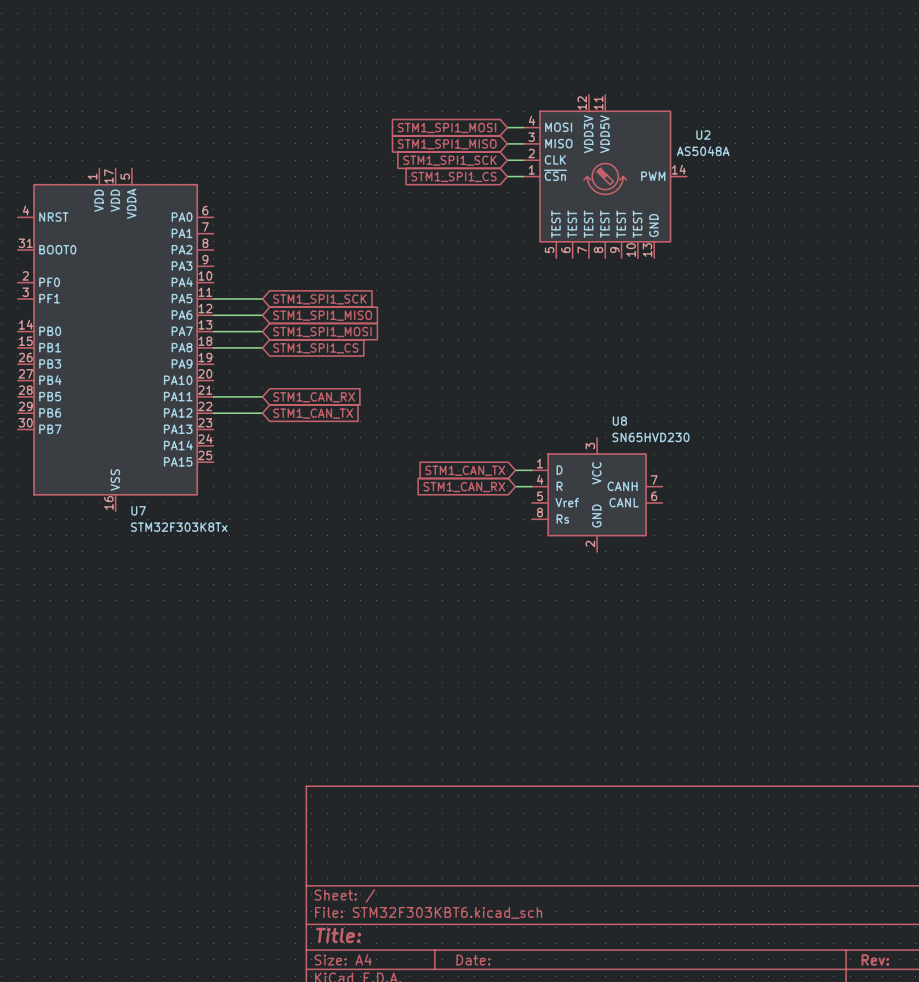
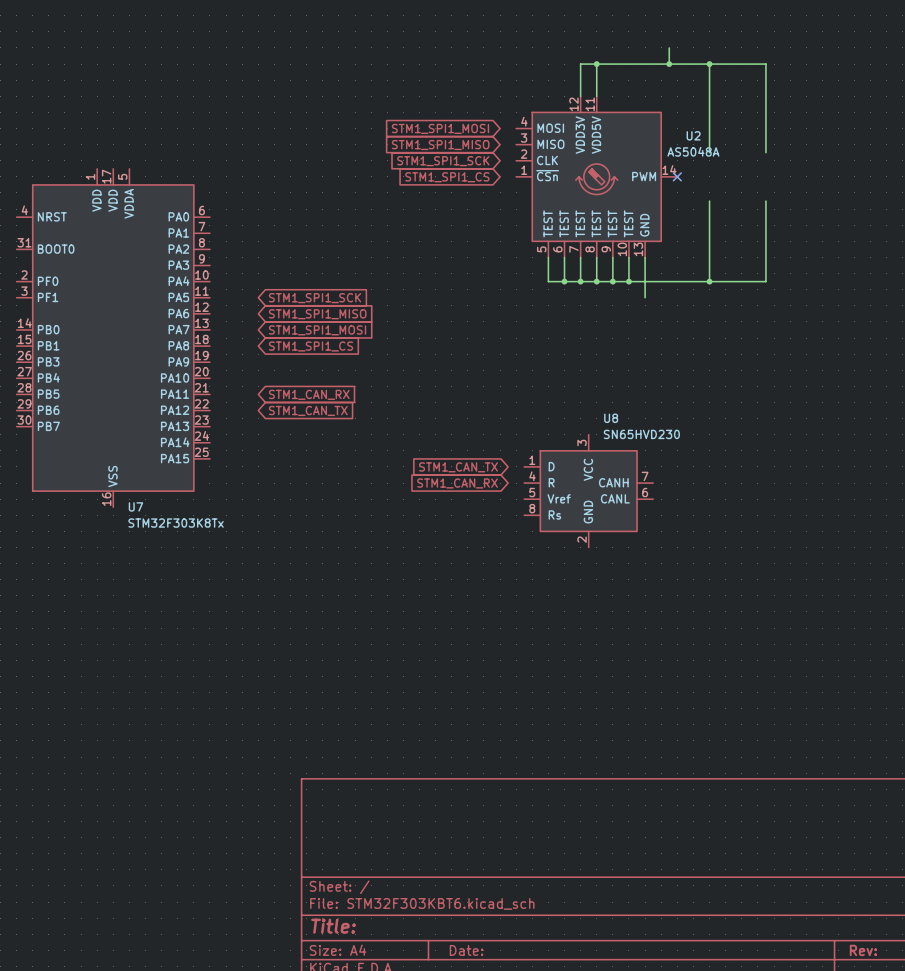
wire: none -> (669, 47) (669, 64)
wire: none -> (596, 64) (596, 96)
junction: none -> (596, 64)
junction: none -> (669, 64)
wire: none -> (709, 64) (709, 152)
junction: none -> (709, 64)
wire: none -> (580, 96) (580, 64) (765, 64) (765, 152)
wire: (507, 127) (523, 127) -> none
wire: (507, 143) (523, 143) -> none
wire: (507, 160) (523, 160) -> none
wire: (507, 176) (523, 176) -> none
no-connect mark: none -> (677, 176)
wire: none -> (709, 201) (709, 281)
wire: none -> (765, 201) (765, 281) (548, 281) (548, 257)
wire: none -> (564, 257) (564, 281)
wire: none -> (580, 257) (580, 281)
wire: none -> (596, 257) (596, 281)
wire: none -> (612, 257) (612, 281)
wire: none -> (628, 257) (628, 281)
wire: none -> (645, 257) (645, 297)
junction: none -> (564, 281)
junction: none -> (580, 281)
junction: none -> (596, 281)
junction: none -> (612, 281)
junction: none -> (628, 281)
junction: none -> (709, 281)
wire: (213, 298) (262, 298) -> none
wire: (213, 315) (262, 315) -> none
wire: (213, 331) (262, 331) -> none
wire: (213, 347) (262, 347) -> none
wire: (213, 396) (262, 396) -> none
wire: (213, 413) (262, 413) -> none
wire: (515, 470) (531, 470) -> none
wire: (515, 486) (531, 486) -> none

